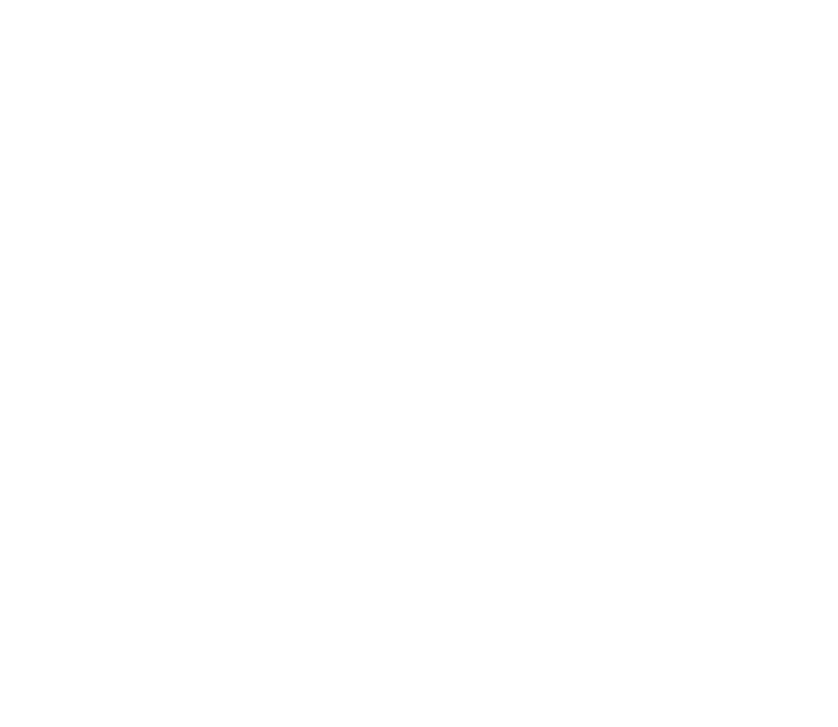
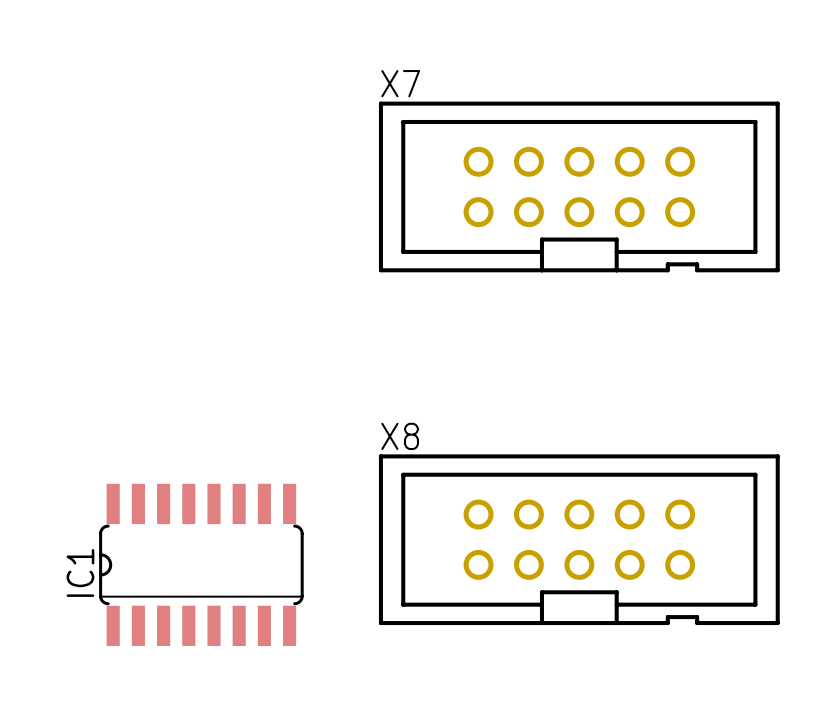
X7: none -> (579, 186)
X8: none -> (579, 539)
IC1: none -> (201, 564)

